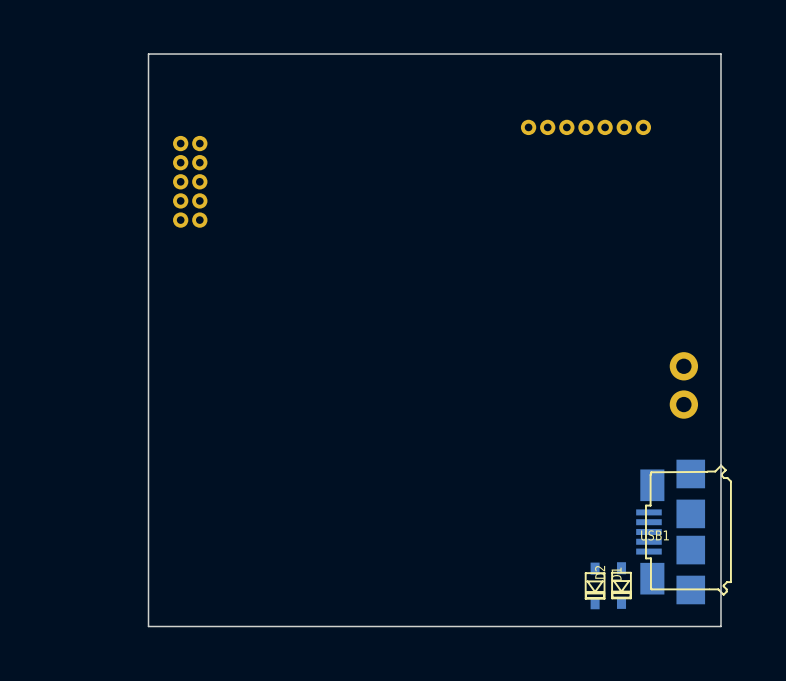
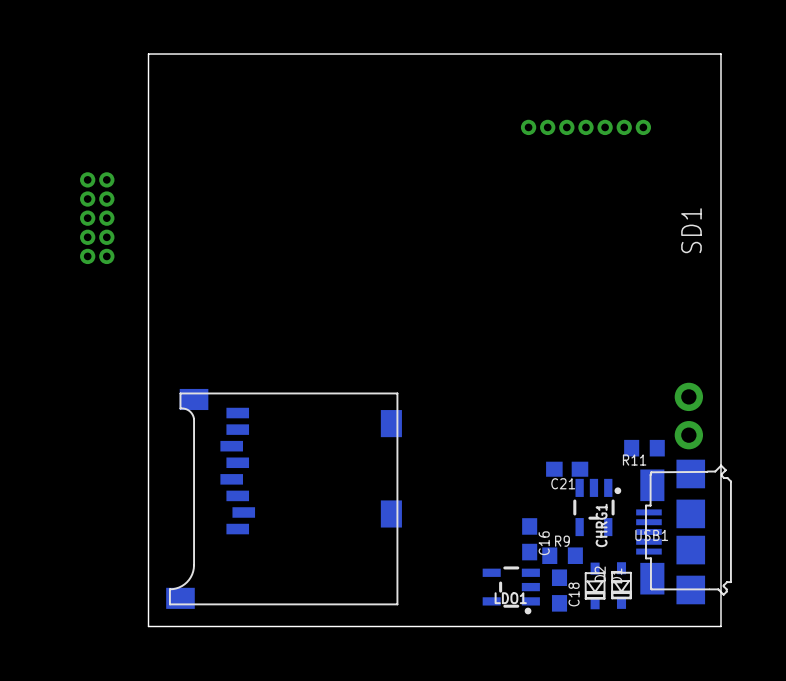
part position: (190, 181) -> (97, 218)
part position: (683, 385) -> (688, 416)
R11: none -> (644, 448)
C21: none -> (567, 469)
SD1: none -> (284, 498)
CHRG1: none -> (597, 507)
C16: none -> (529, 539)
R9: none -> (562, 555)
LDO1: none -> (511, 590)
C18: none -> (559, 590)

